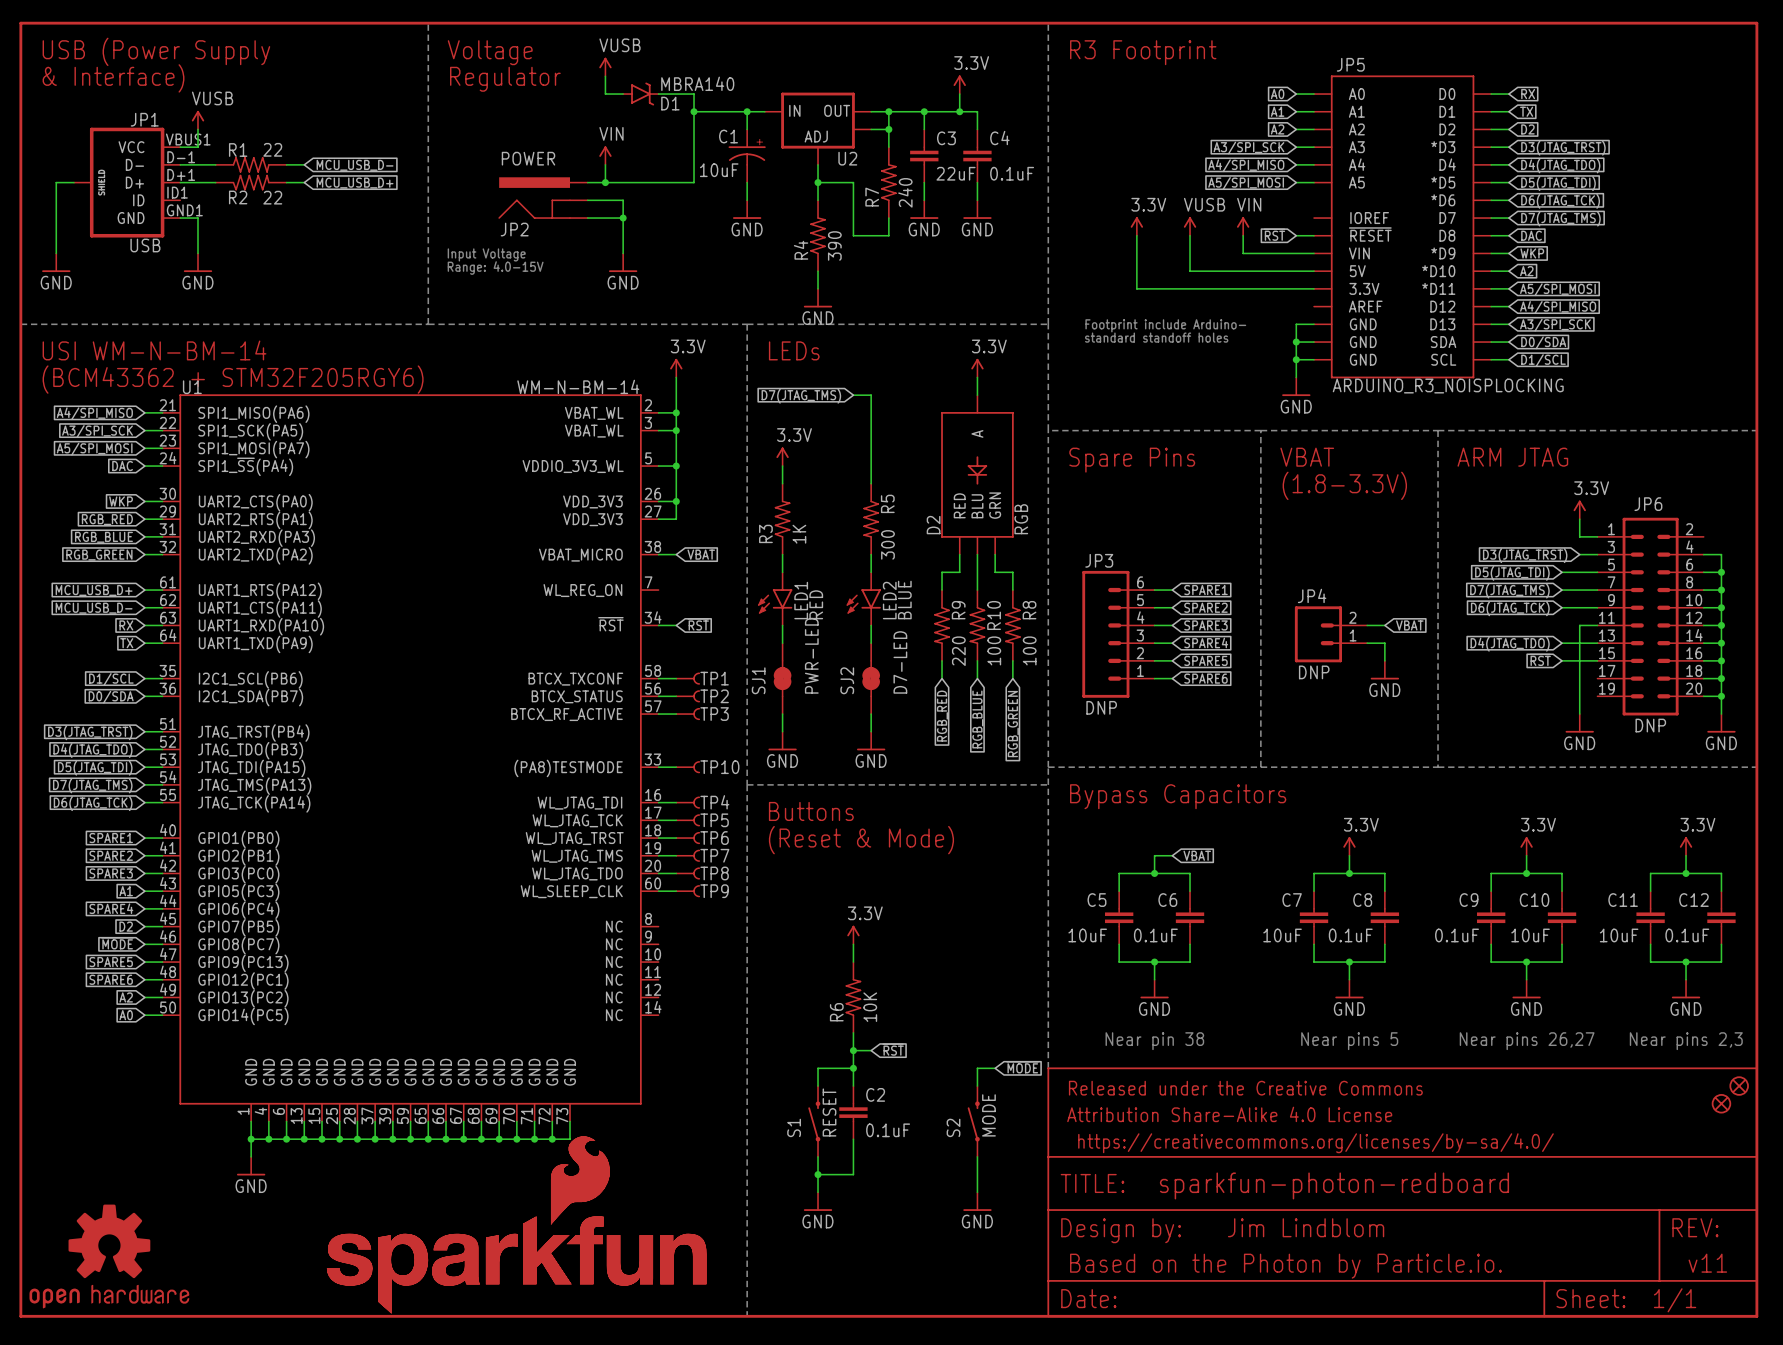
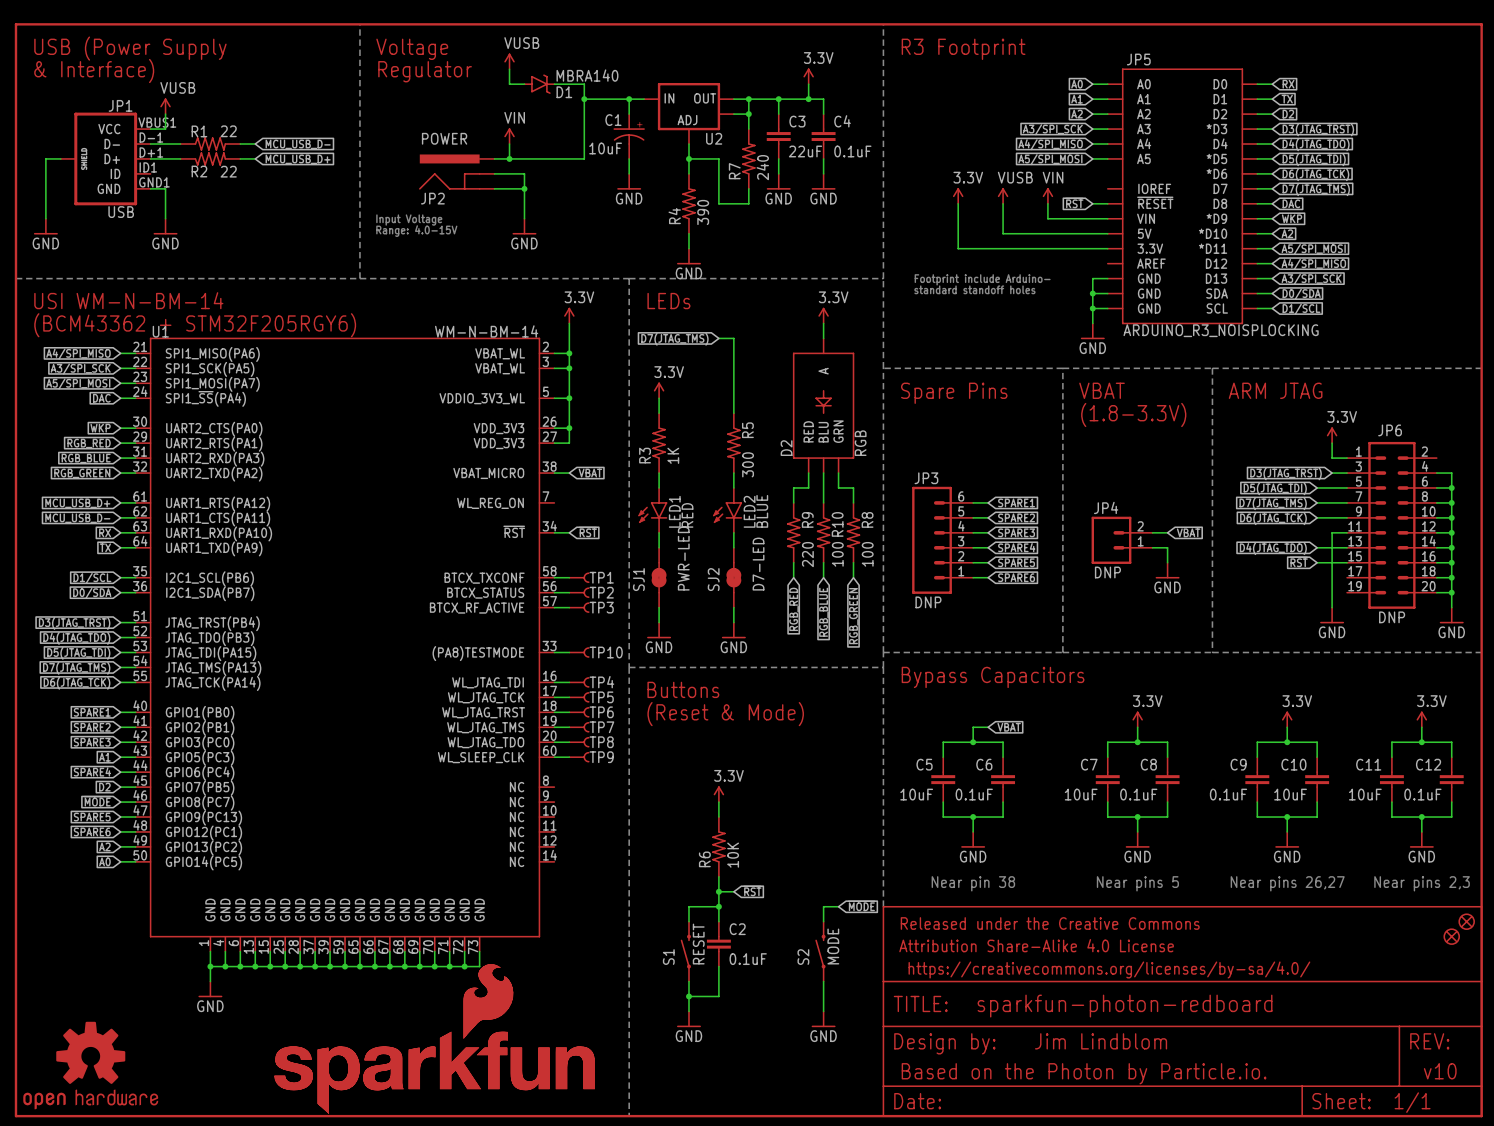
text: v11 (1707, 1263) -> v10 (1440, 1071)

